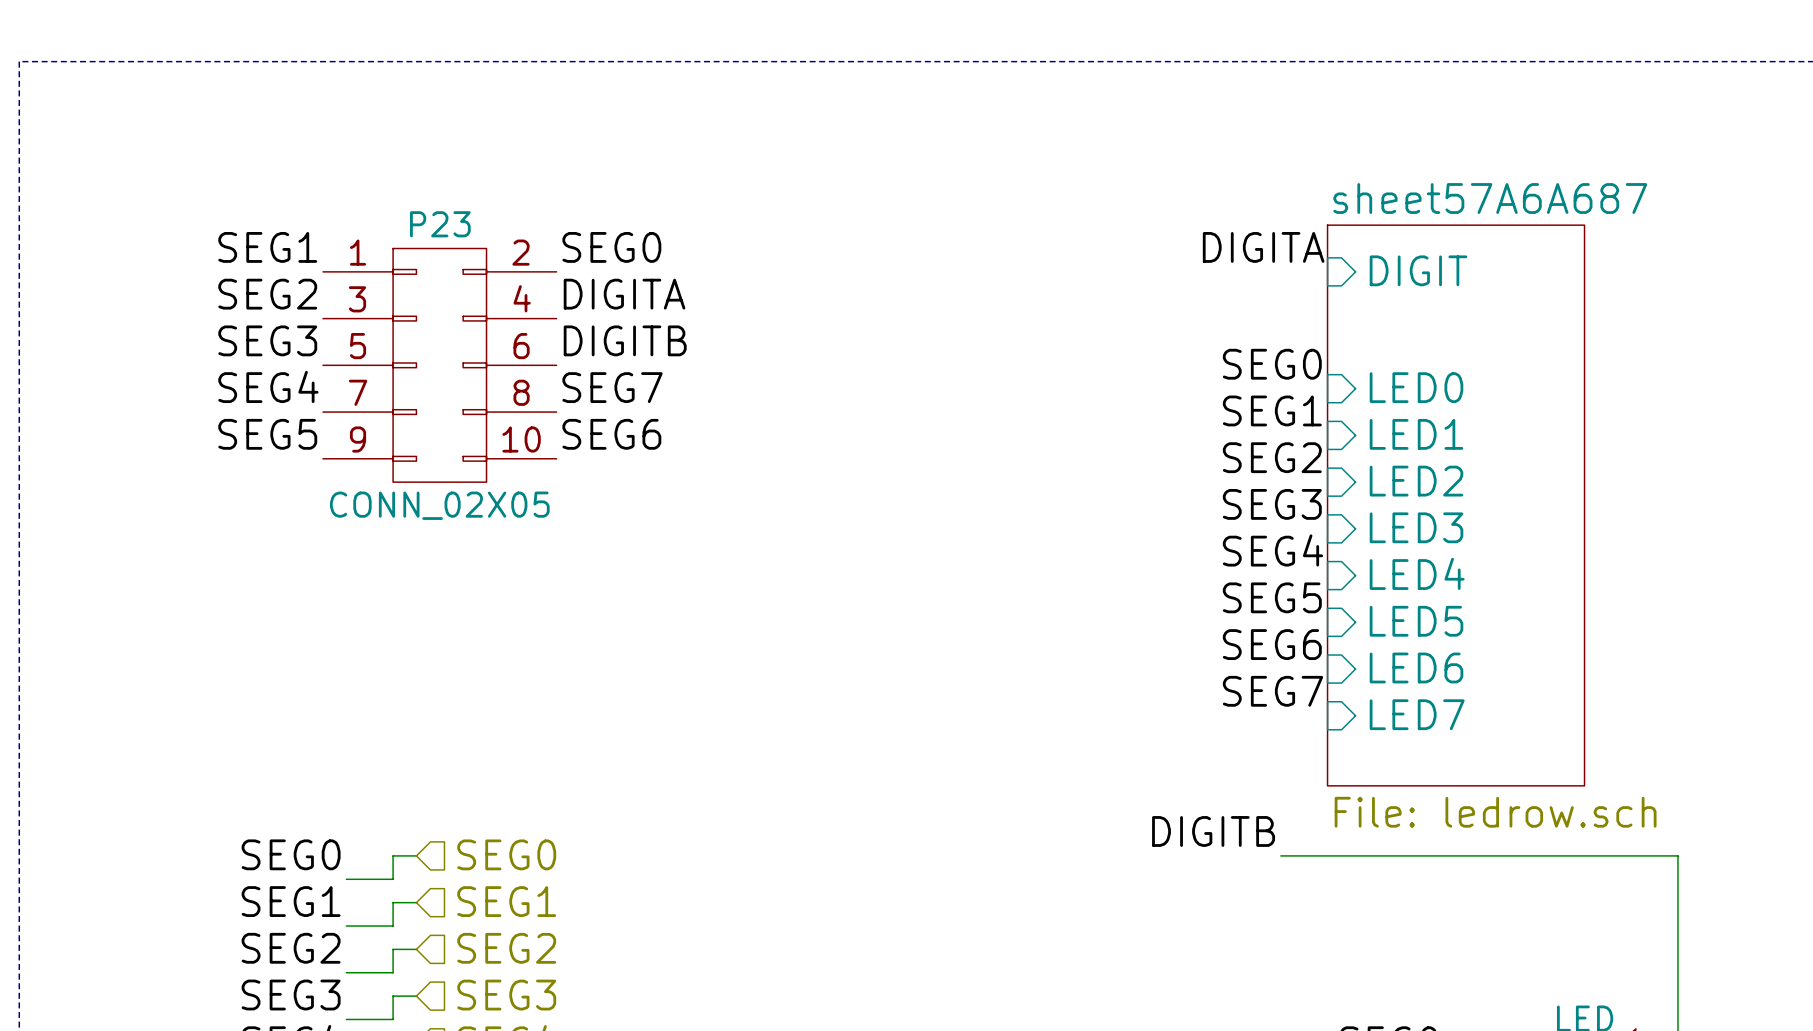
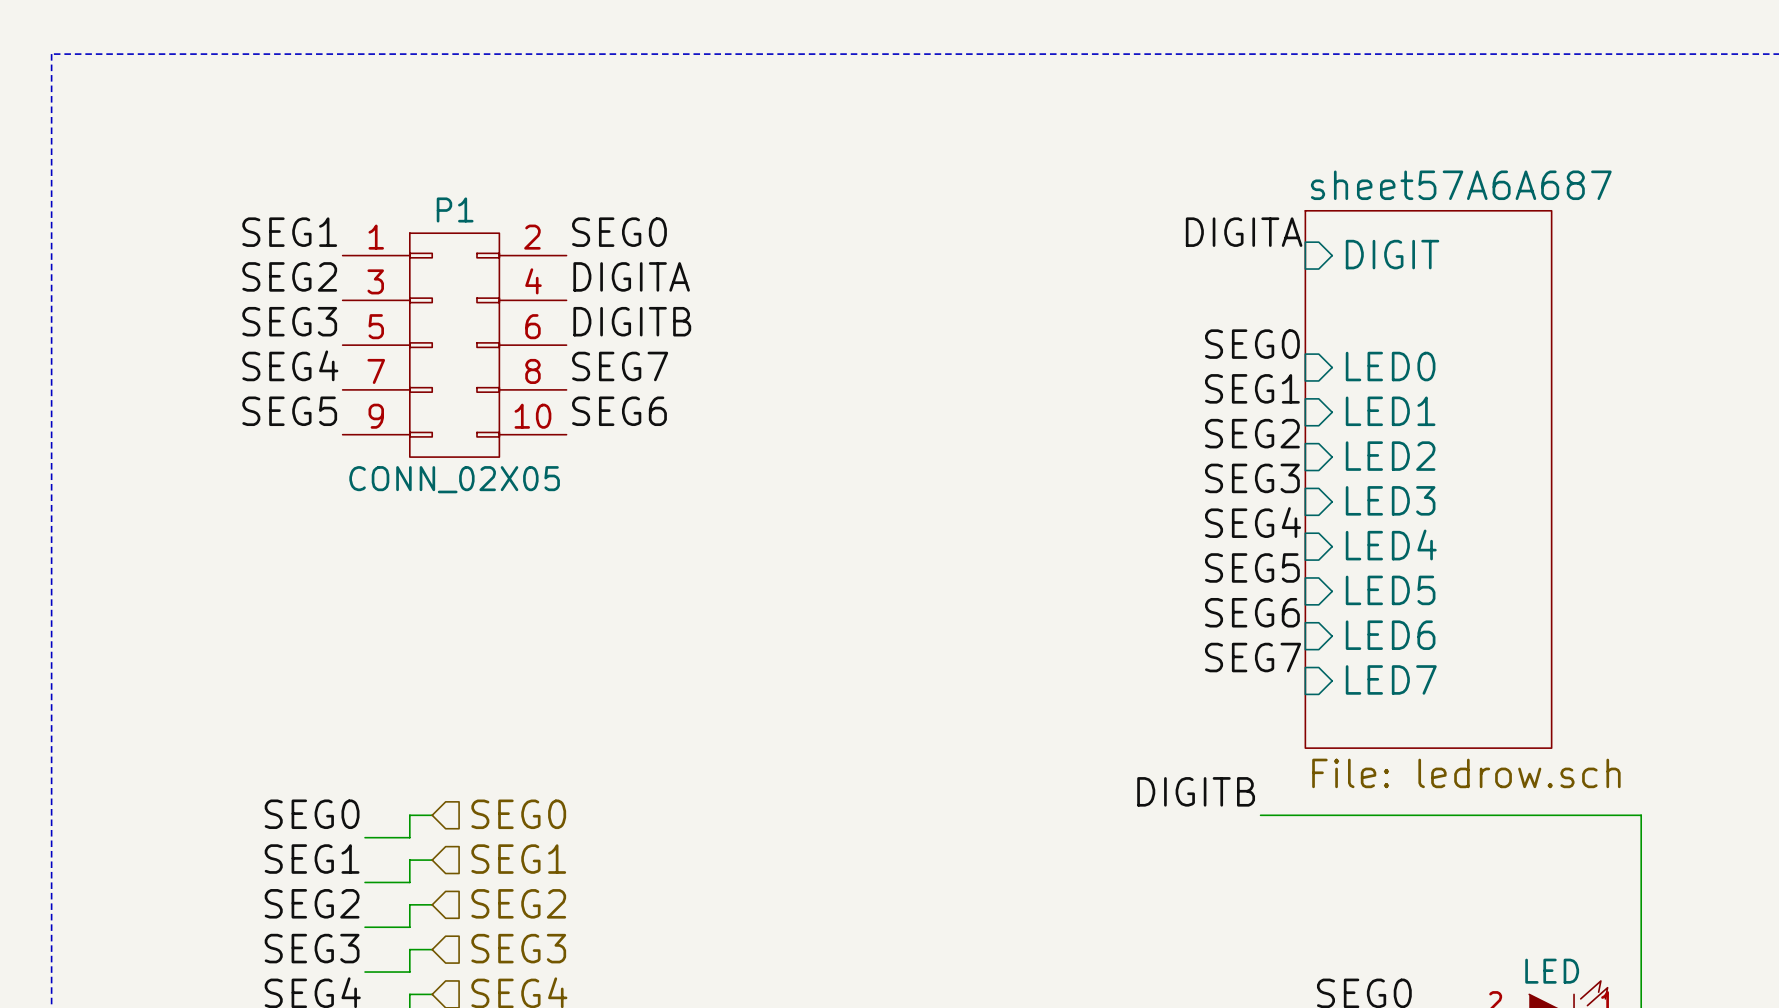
P23 name: P23 (440, 224) -> P1 (455, 209)

